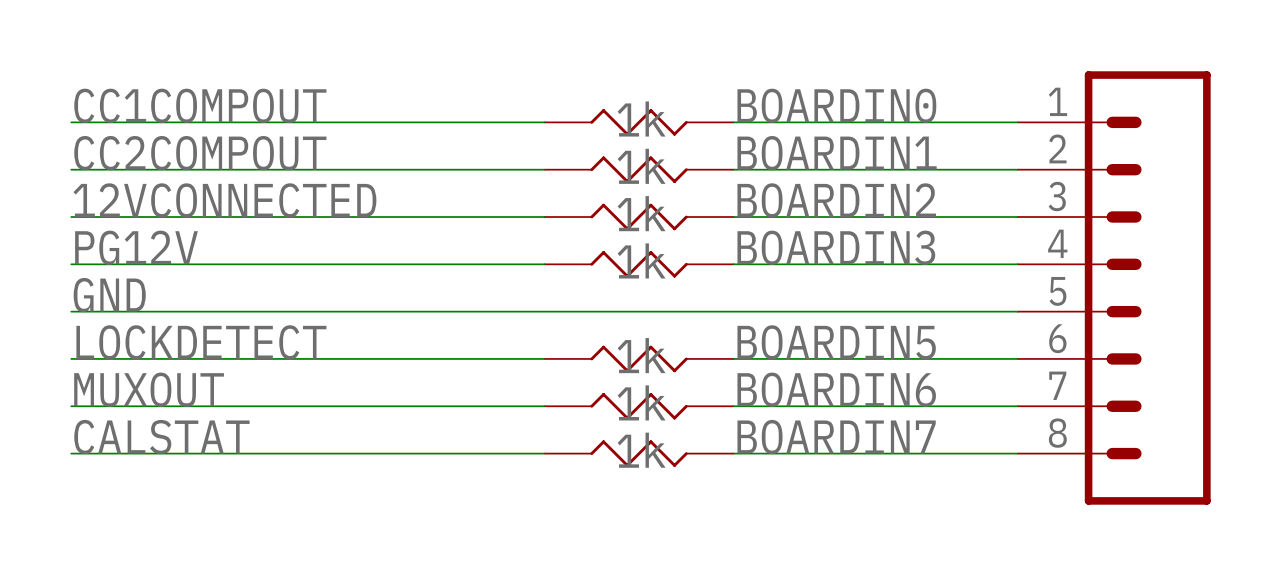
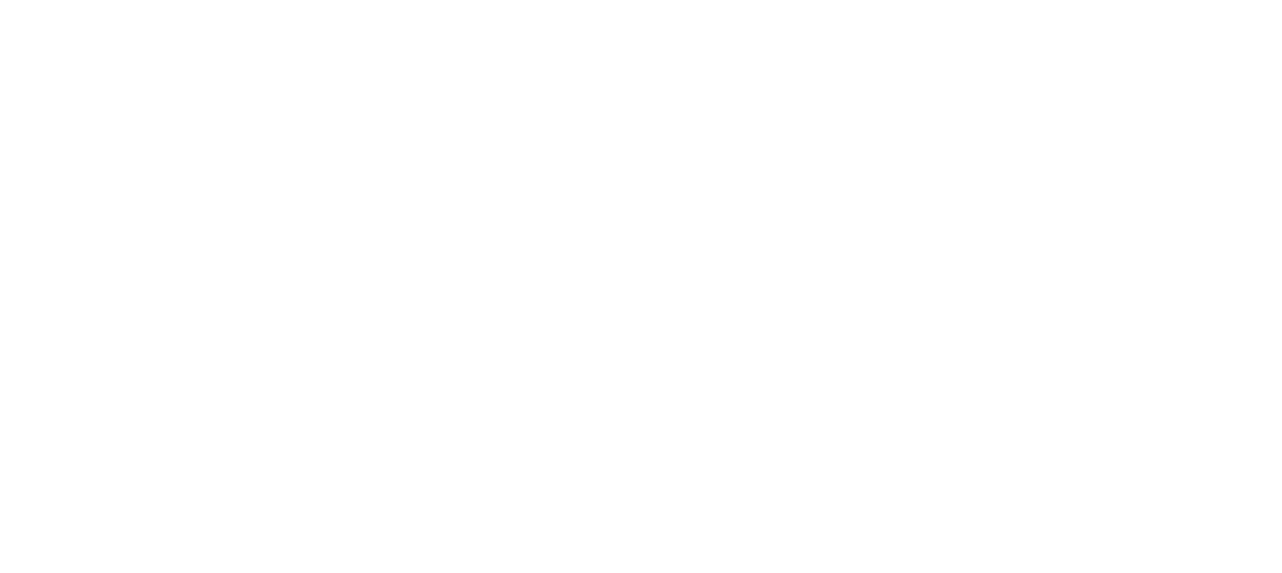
label: CC1COMPOUT (200, 105) -> none
label: BOARDIN0 (836, 105) -> none
wire: (71, 122) (544, 122) -> none
part: 1k (639, 122) -> none
wire: (733, 122) (1017, 122) -> none
label: CC2COMPOUT (200, 153) -> none
label: BOARDIN1 (837, 153) -> none
wire: (71, 169) (544, 169) -> none
part: 1k (639, 169) -> none
wire: (733, 169) (1017, 169) -> none
label: 12VCONNECTED (224, 200) -> none
label: BOARDIN2 (836, 200) -> none
wire: (71, 217) (544, 217) -> none
part: 1k (639, 217) -> none
wire: (733, 217) (1017, 217) -> none
label: PG12V (136, 247) -> none
label: BOARDIN3 (836, 247) -> none
wire: (71, 264) (544, 264) -> none
part: 1k (639, 264) -> none
wire: (733, 264) (1017, 264) -> none
part: (1114, 287) -> none
label: GND (109, 295) -> none
wire: (71, 311) (1017, 311) -> none
label: LOCKDETECT (201, 342) -> none
label: BOARDIN5 (836, 342) -> none
wire: (71, 358) (544, 358) -> none
part: 1k (639, 358) -> none
wire: (733, 358) (1017, 358) -> none
label: MUXOUT (149, 389) -> none
label: BOARDIN6 (836, 389) -> none
wire: (71, 406) (544, 406) -> none
part: 1k (639, 406) -> none
wire: (733, 406) (1017, 406) -> none
label: CALSTAT (161, 437) -> none
label: BOARDIN7 (836, 437) -> none
wire: (71, 453) (544, 453) -> none
part: 1k (639, 453) -> none
wire: (733, 453) (1017, 453) -> none

